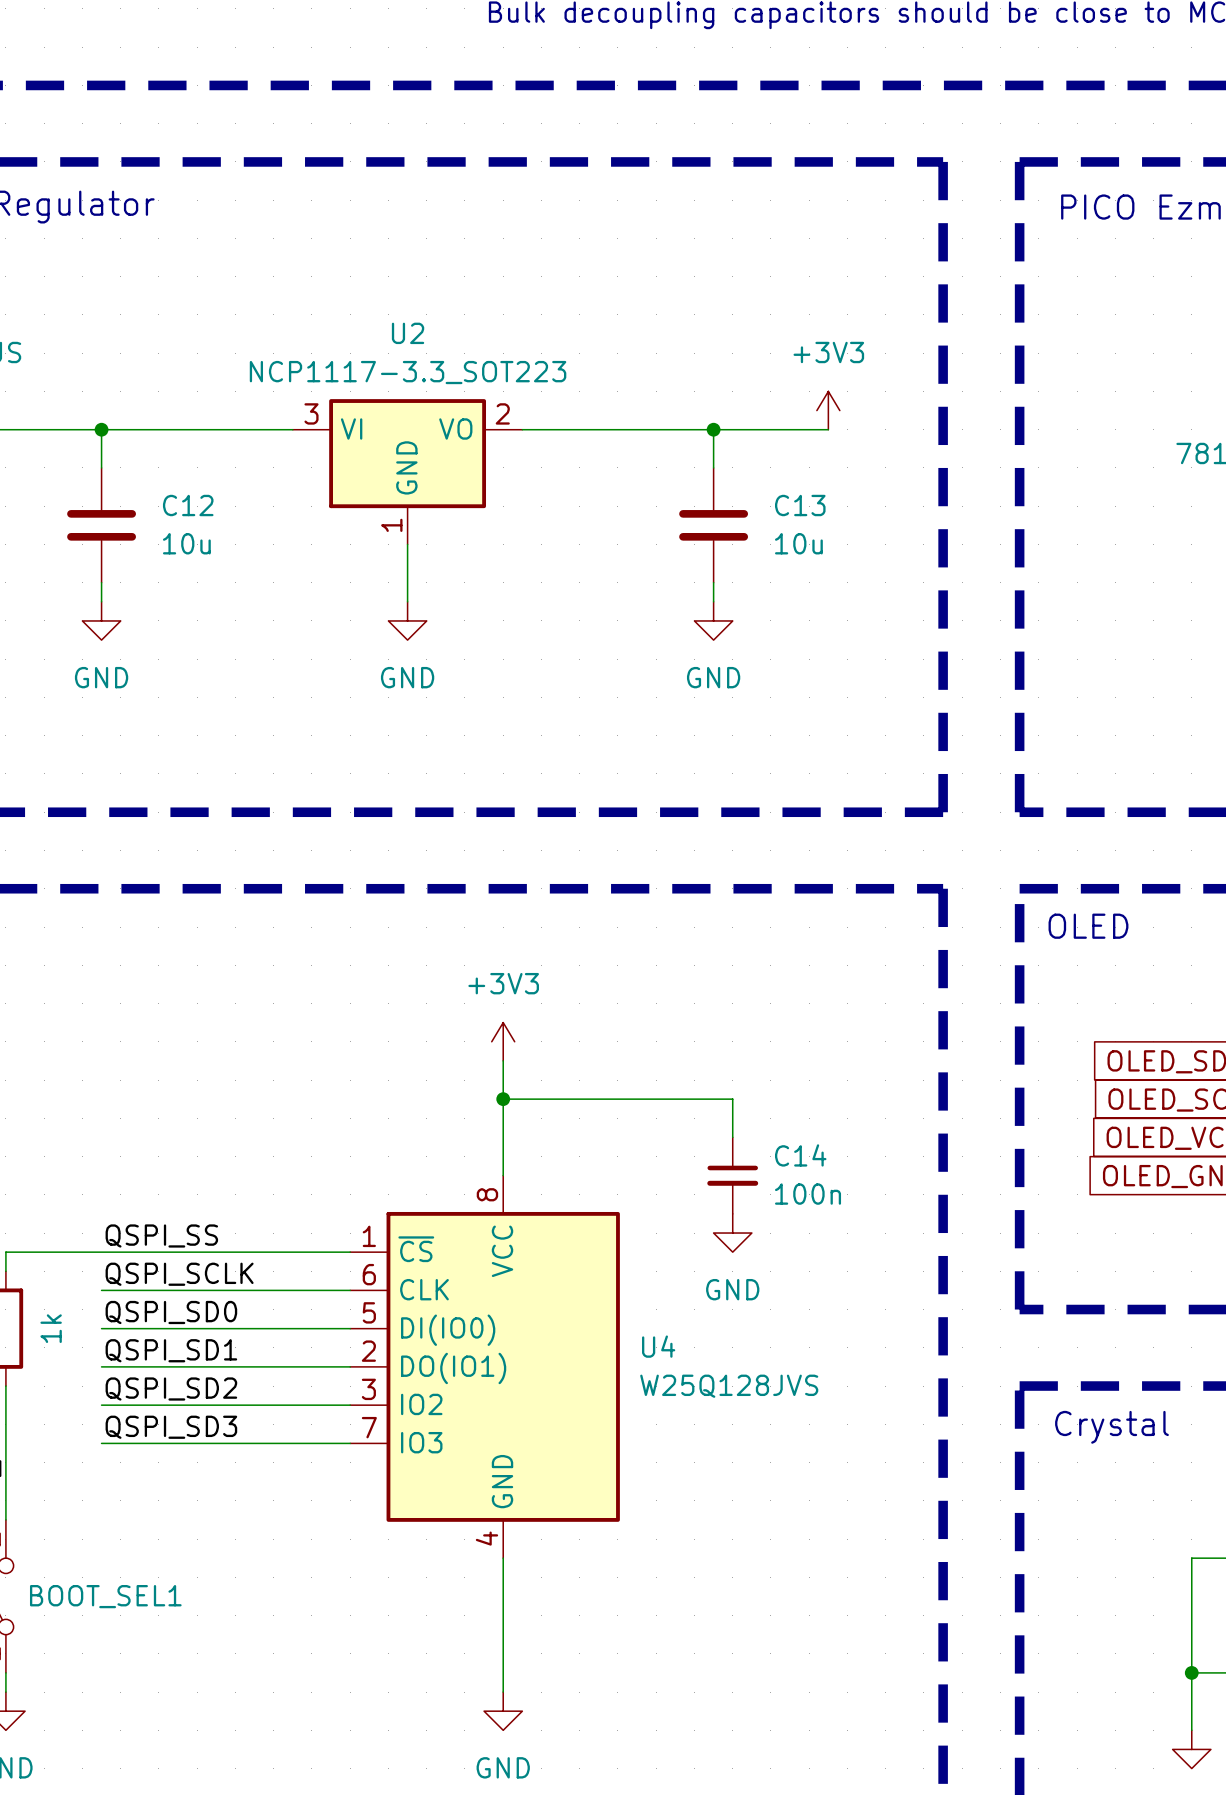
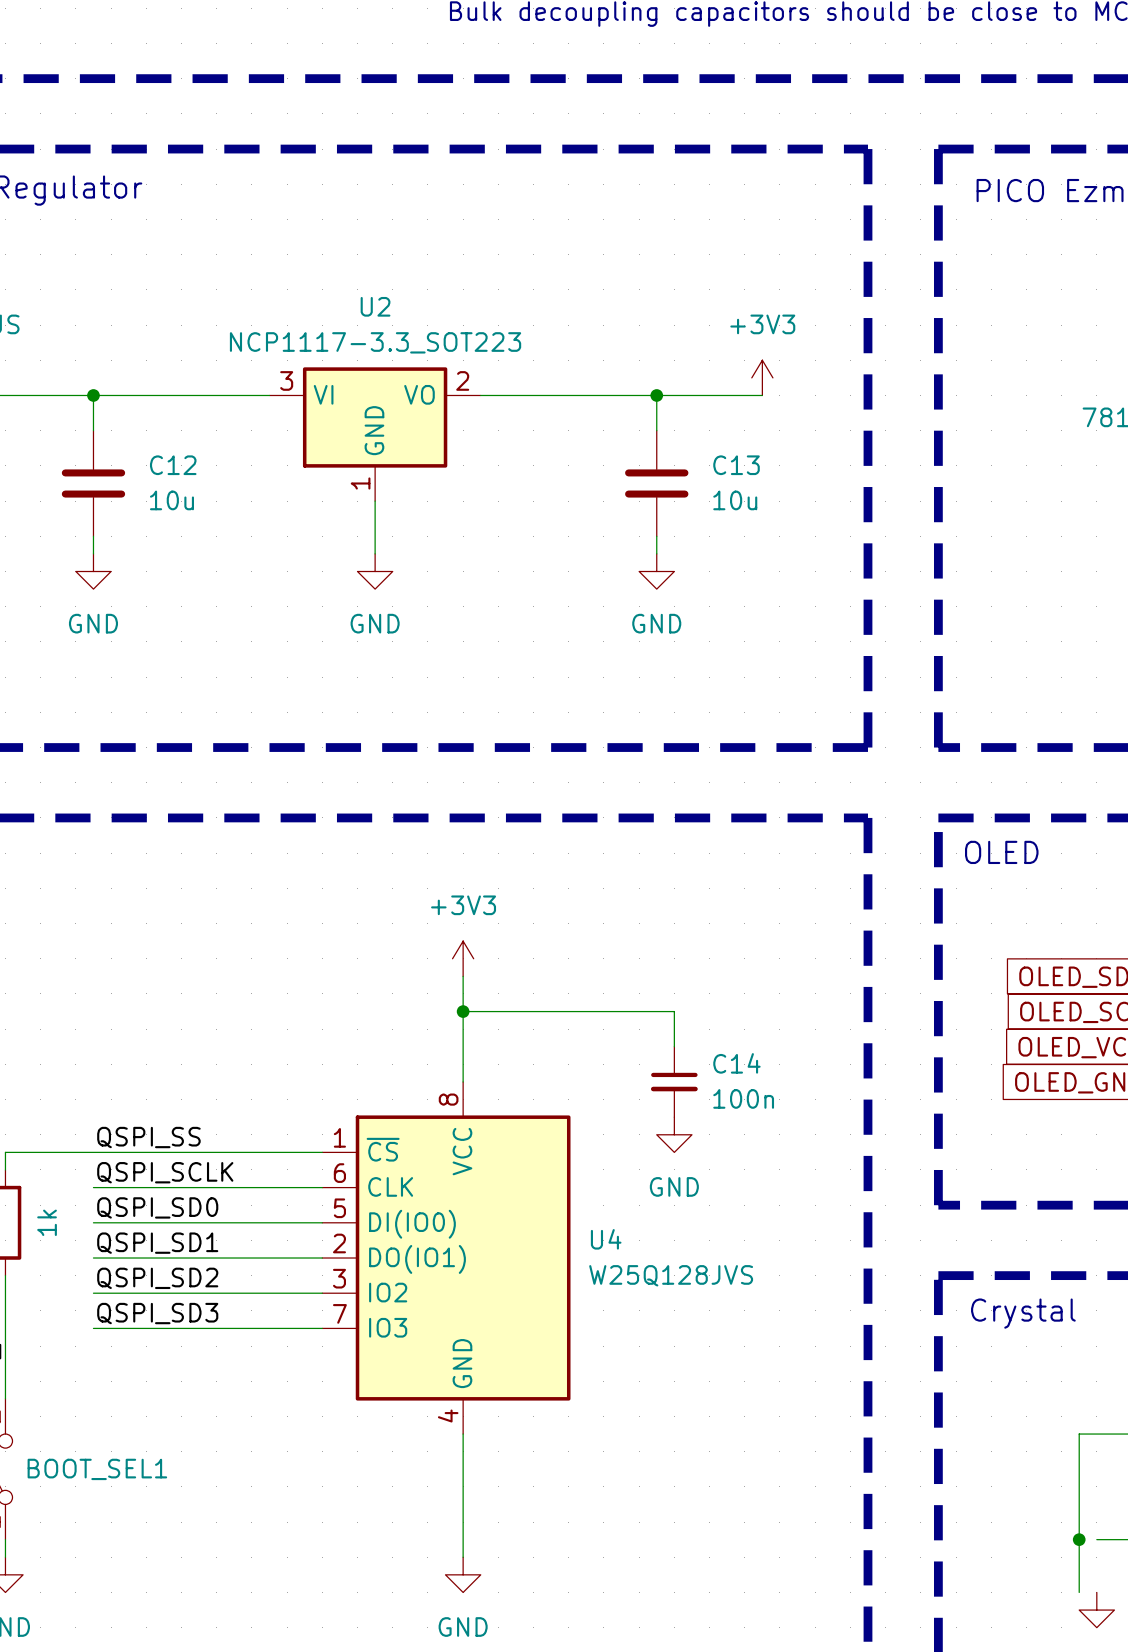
wire: (1191, 1558) (1191, 1730) -> (1096, 1434) (1079, 1434) (1079, 1592)
junction position: (1191, 1672) -> (1079, 1539)

